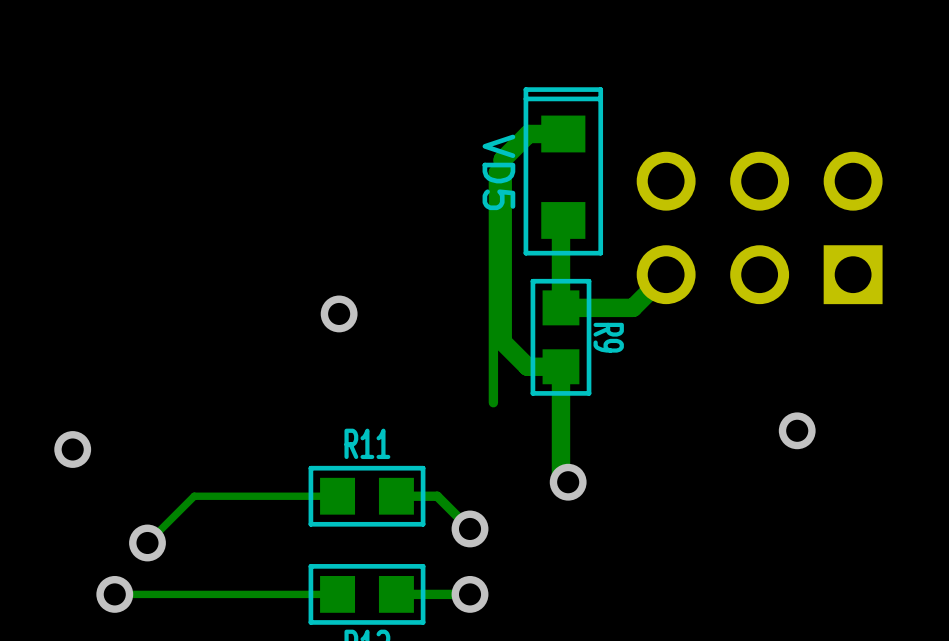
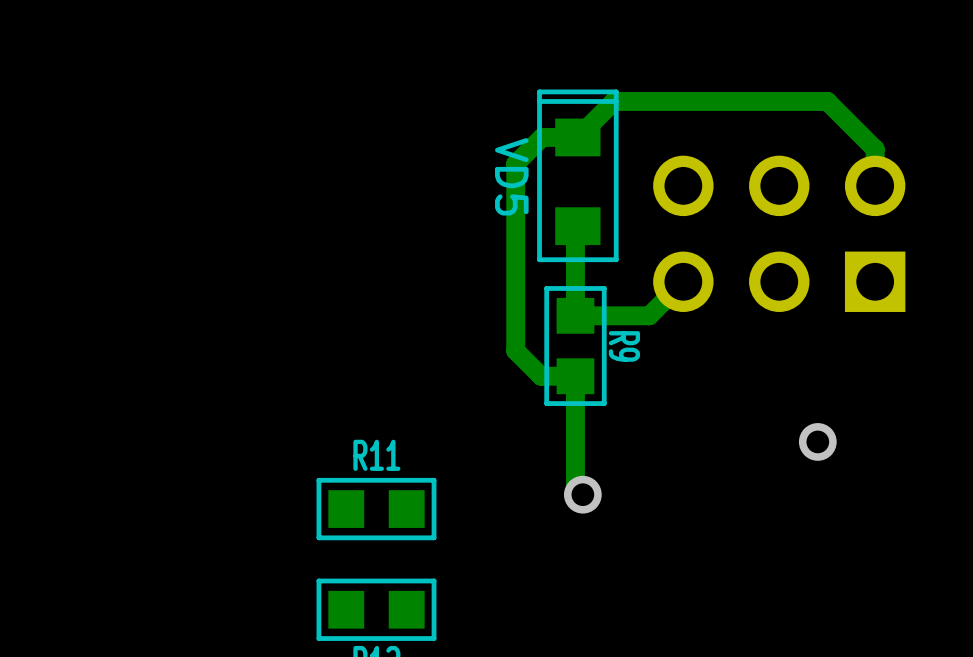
track: (530, 133) (493, 171) (493, 402) -> none
track: none -> (577, 137) (613, 101) (827, 101) (875, 149) (875, 185)
via: (339, 313) -> none
via: (72, 449) -> none
track: (332, 496) (194, 496) (147, 542) -> none
track: (402, 496) (437, 496) (470, 528) -> none
via: (470, 528) -> none
via: (147, 542) -> none
via: (114, 594) -> none
track: (332, 594) (114, 594) -> none
track: (470, 594) (402, 594) -> none
via: (470, 594) -> none

